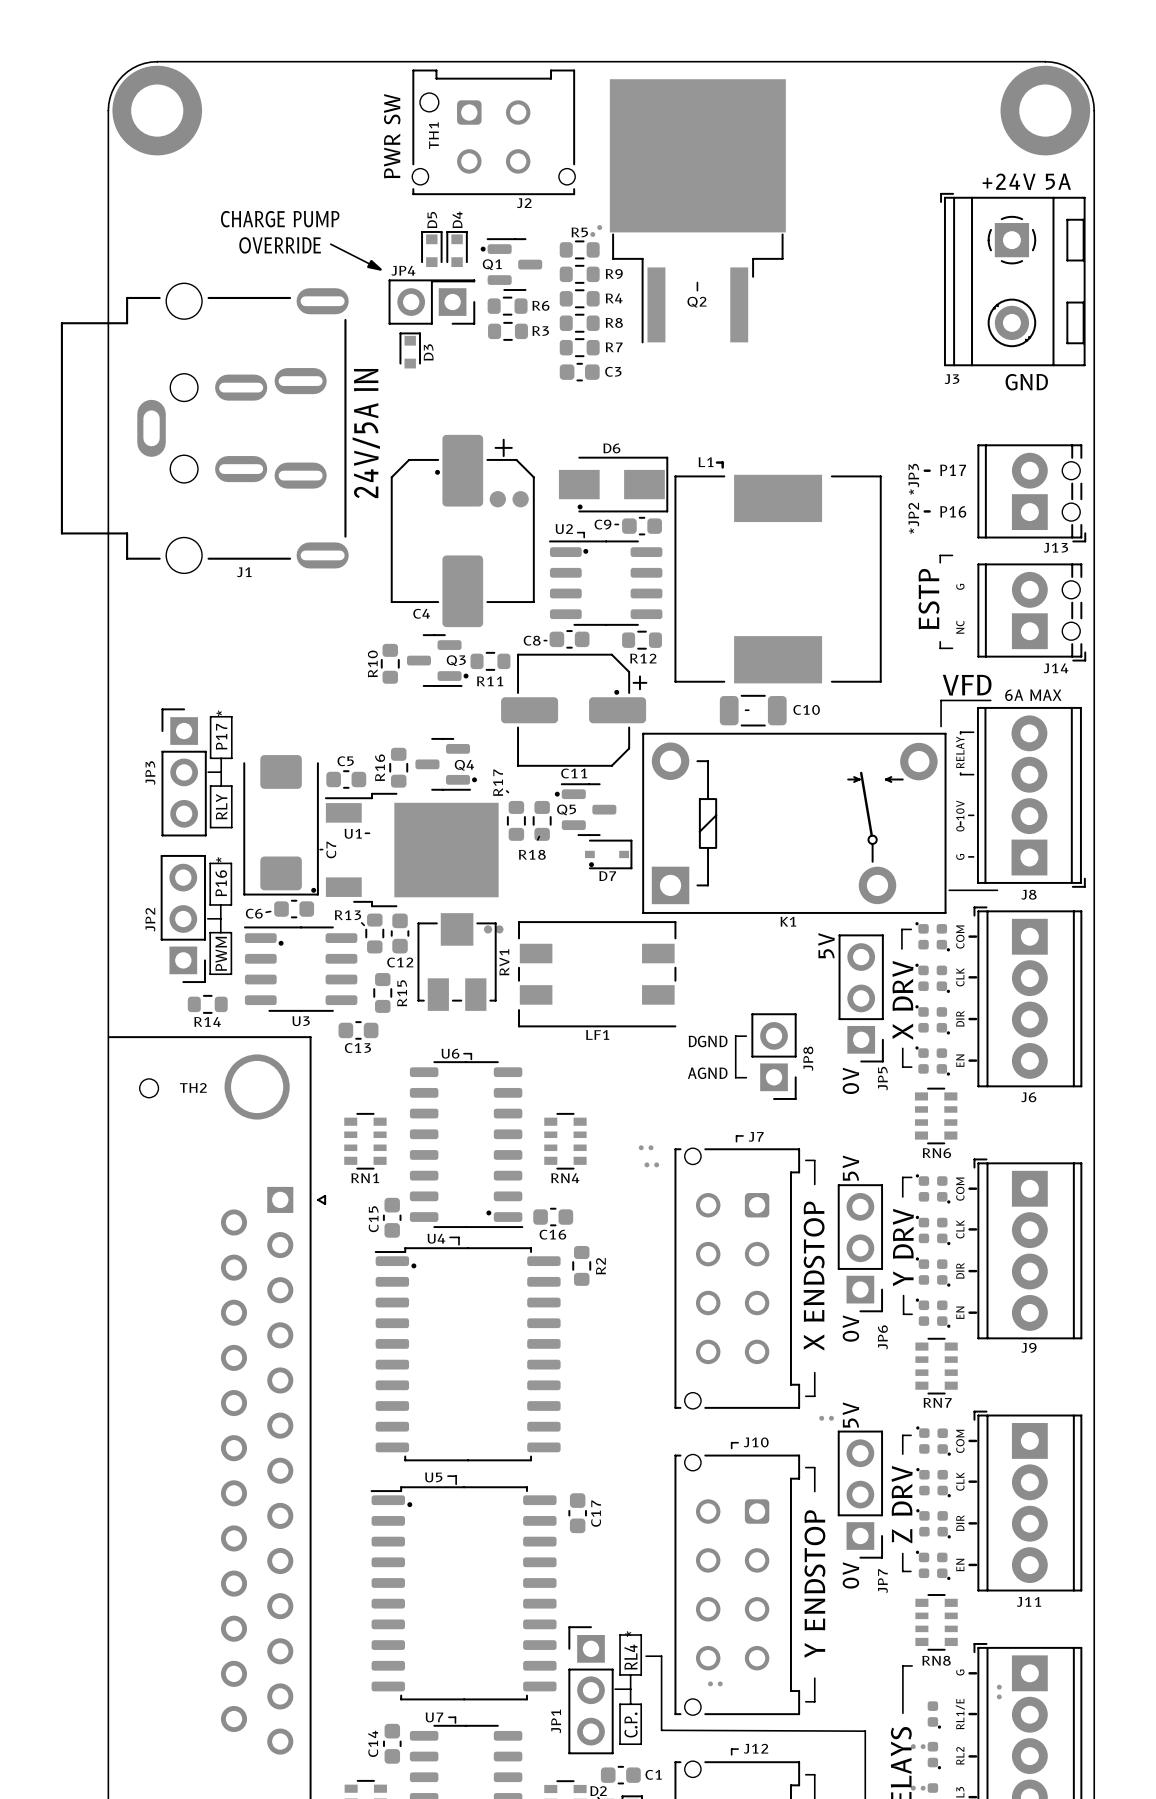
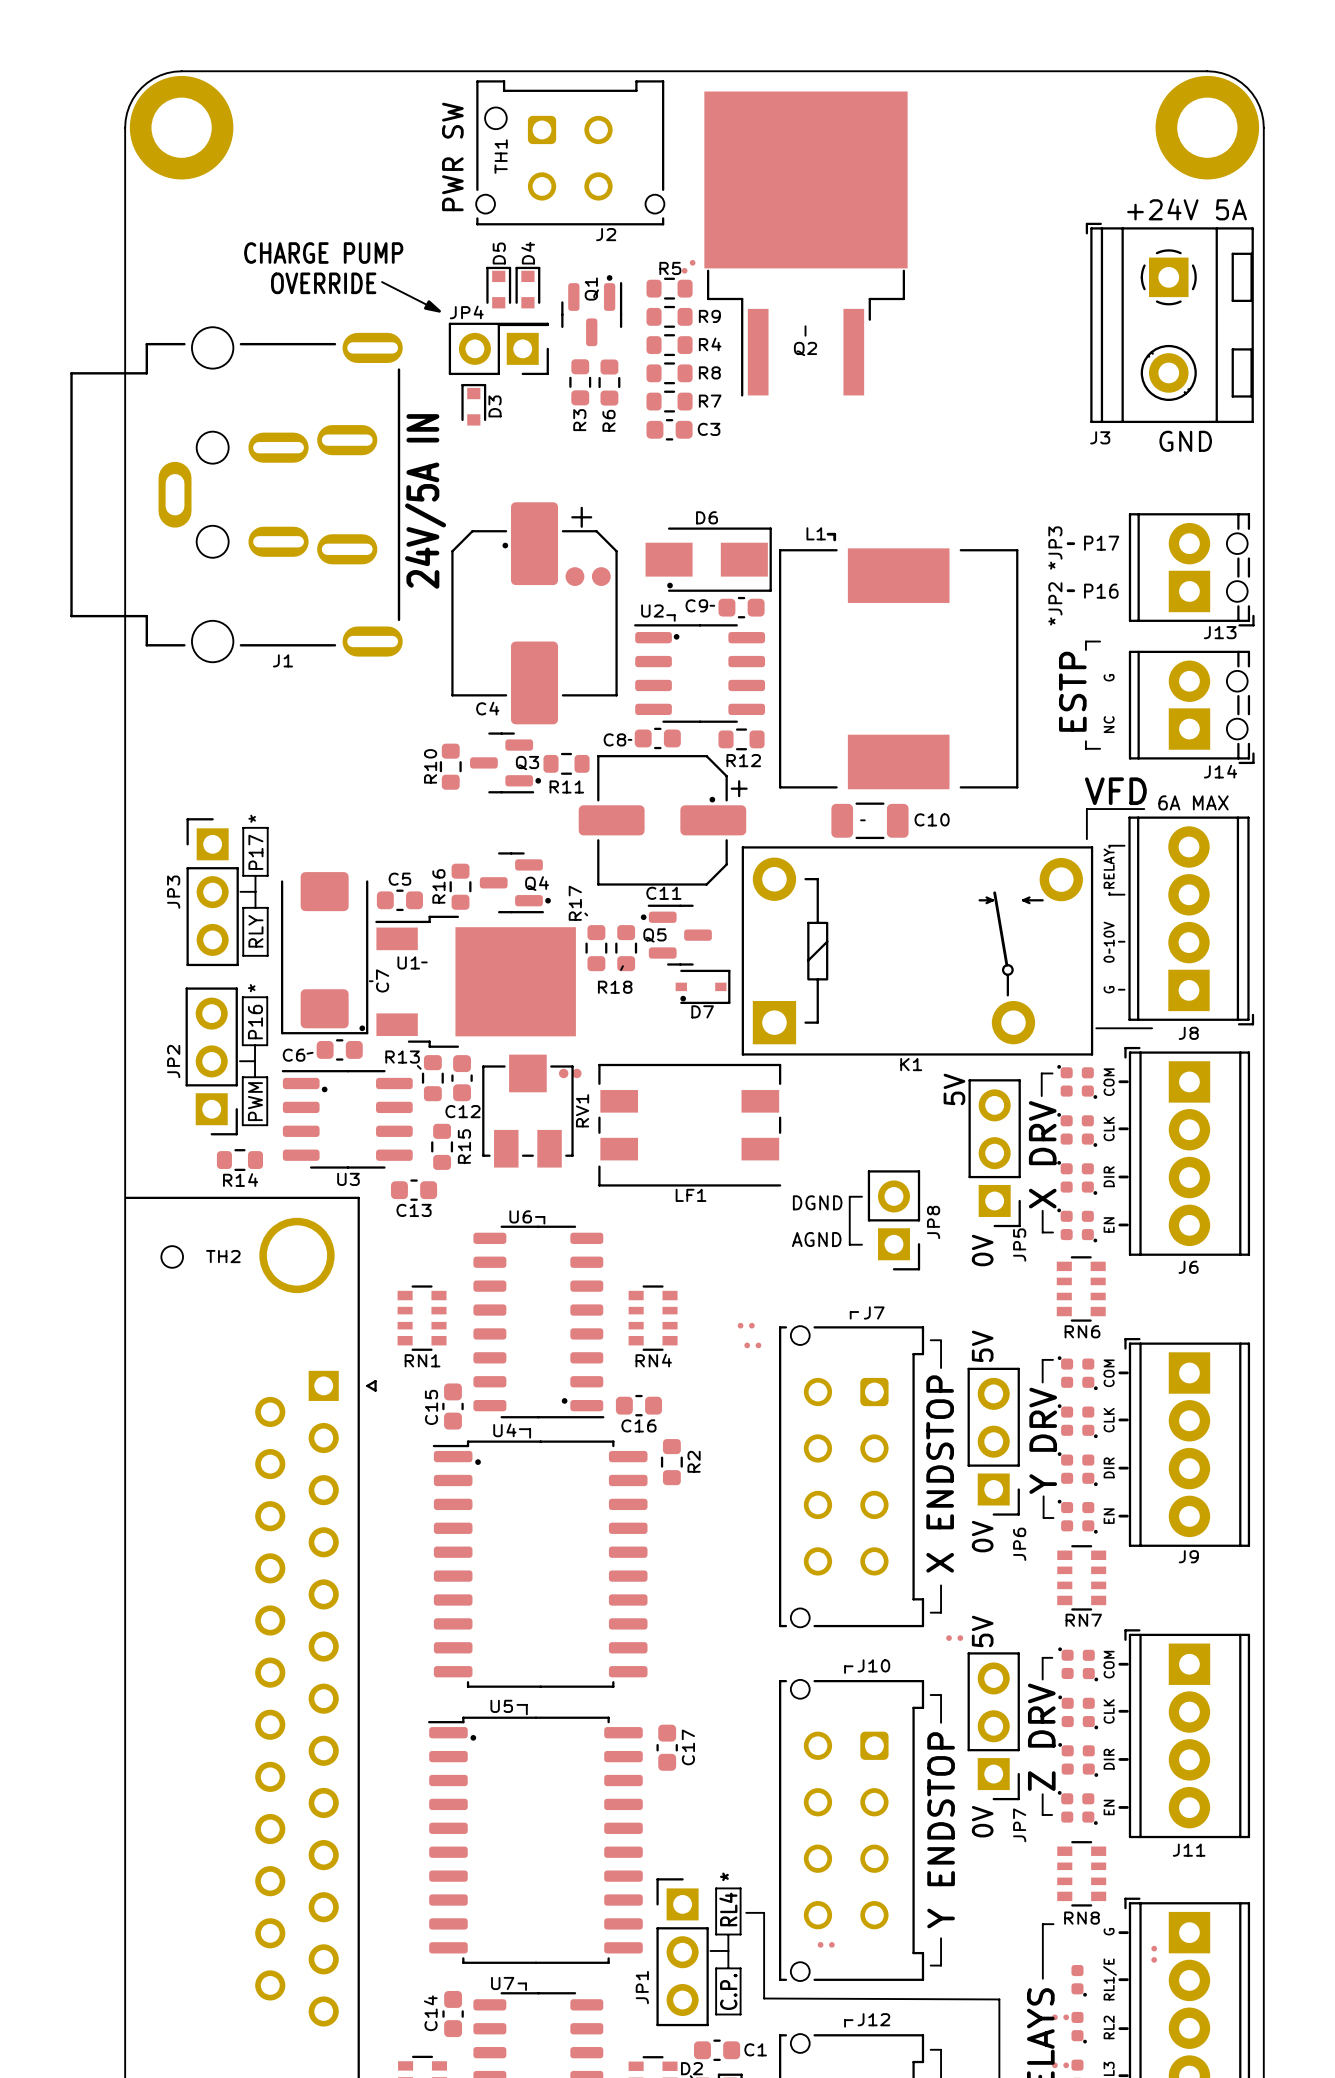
Q1 rotation: 0° (511, 264) -> 90° clockwise (591, 310)
R6 rotation: 0° (507, 306) -> 90° clockwise (609, 382)
R6 position: (507, 306) -> (609, 382)
R3 rotation: 0° (508, 331) -> 90° clockwise (580, 382)

